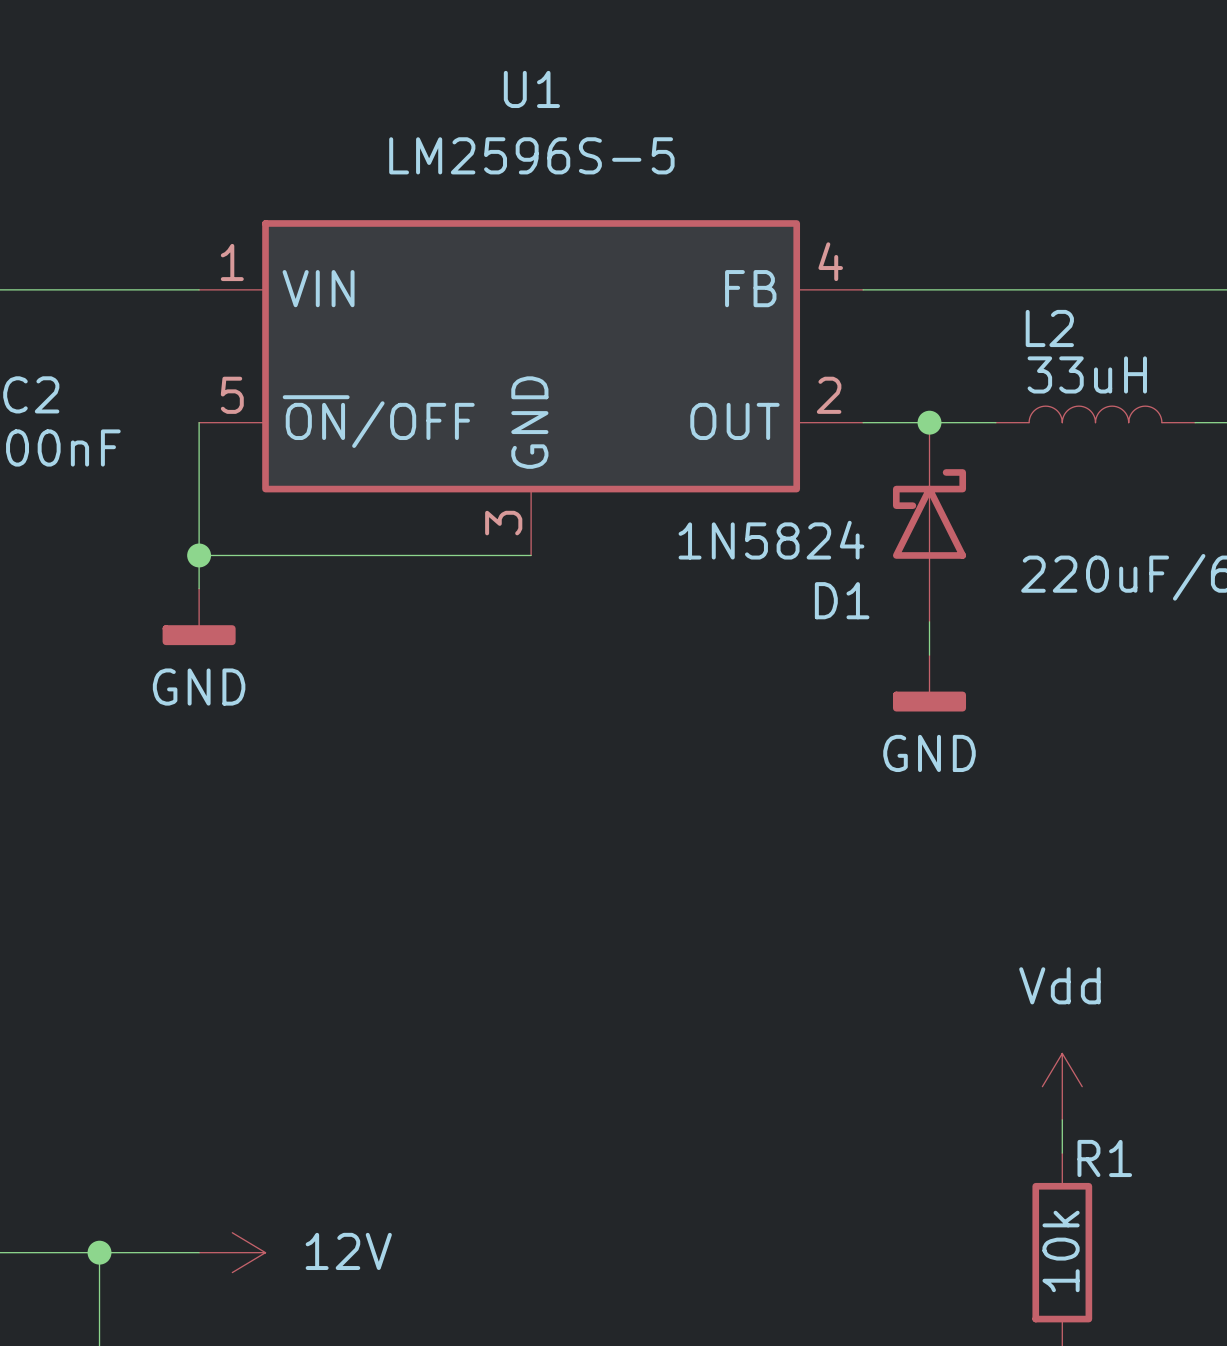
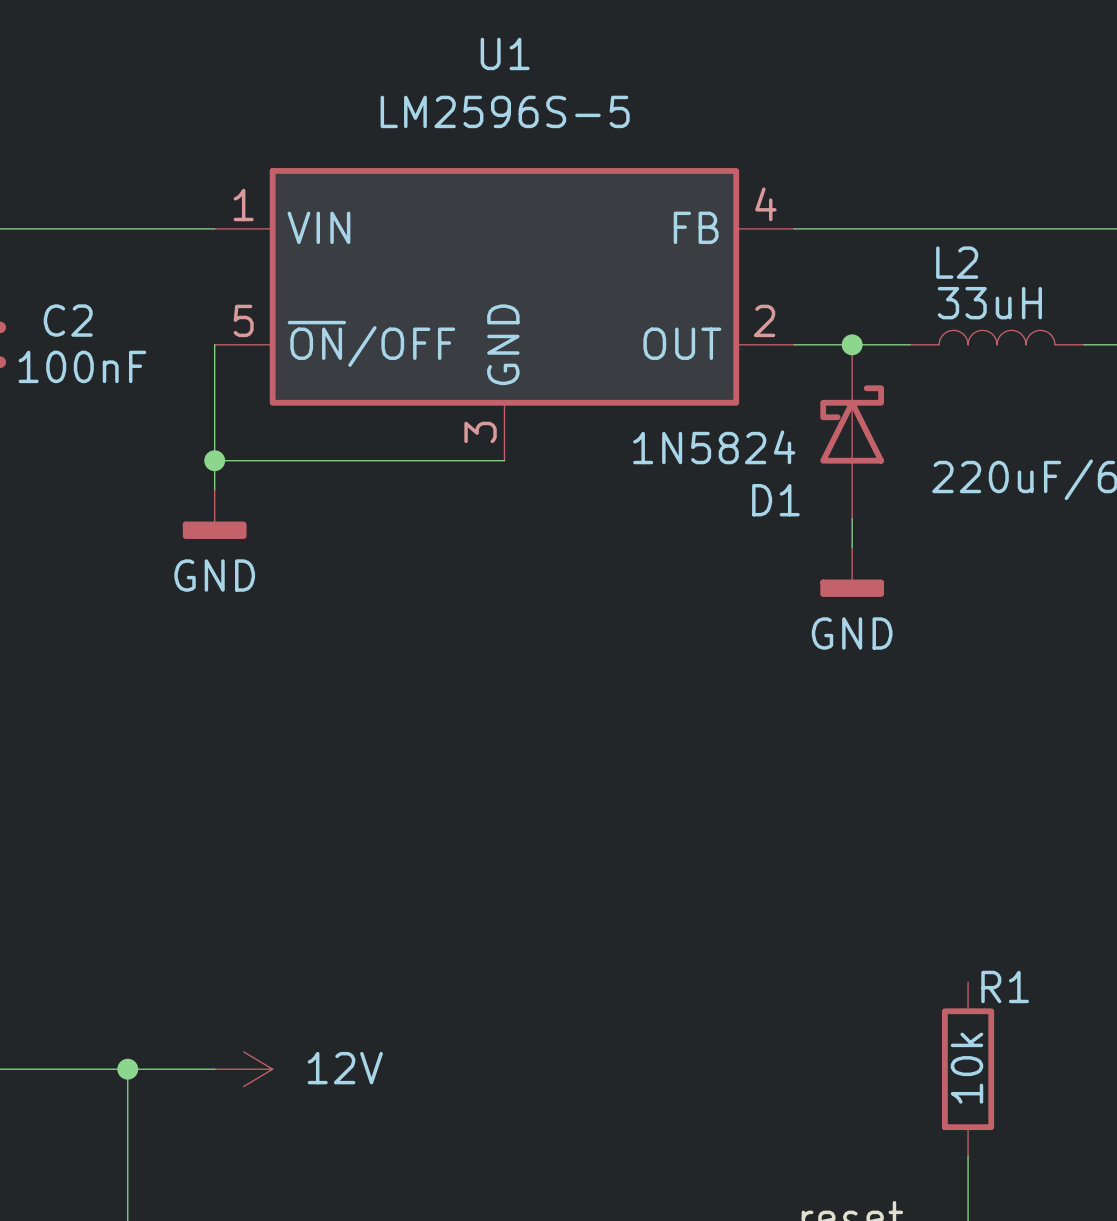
power symbol: Vdd (1062, 1086) -> none
wire: (1062, 1119) (1062, 1153) -> none

